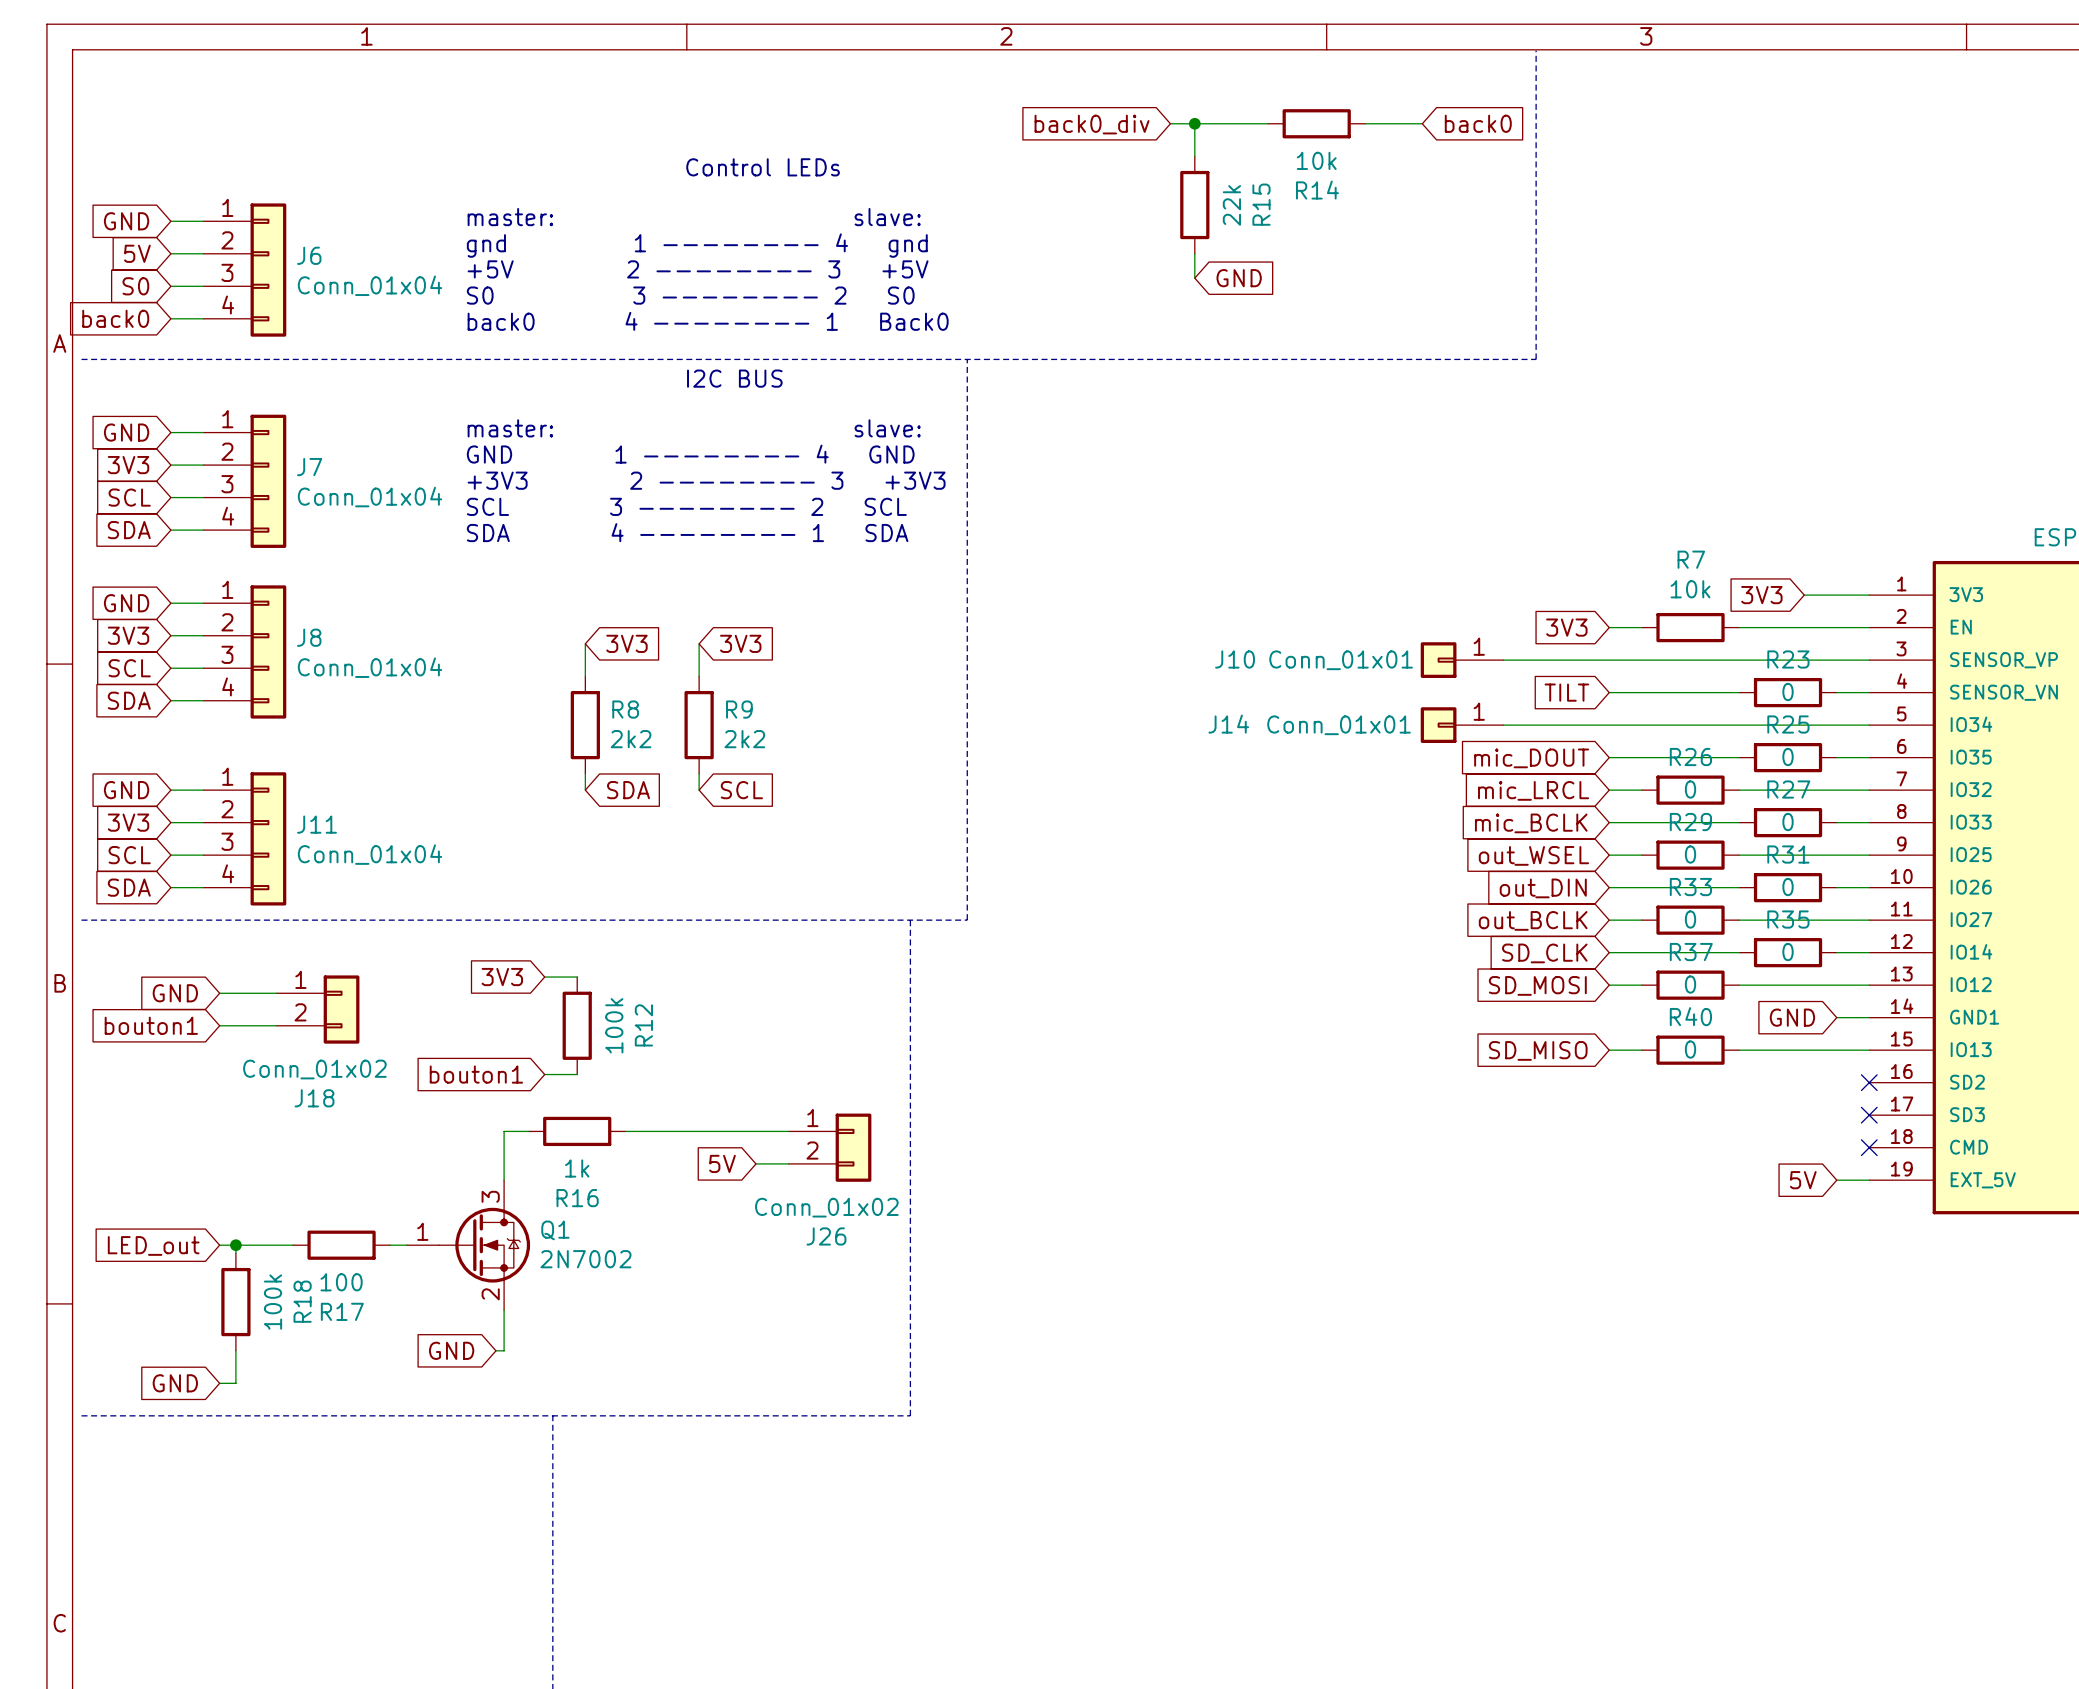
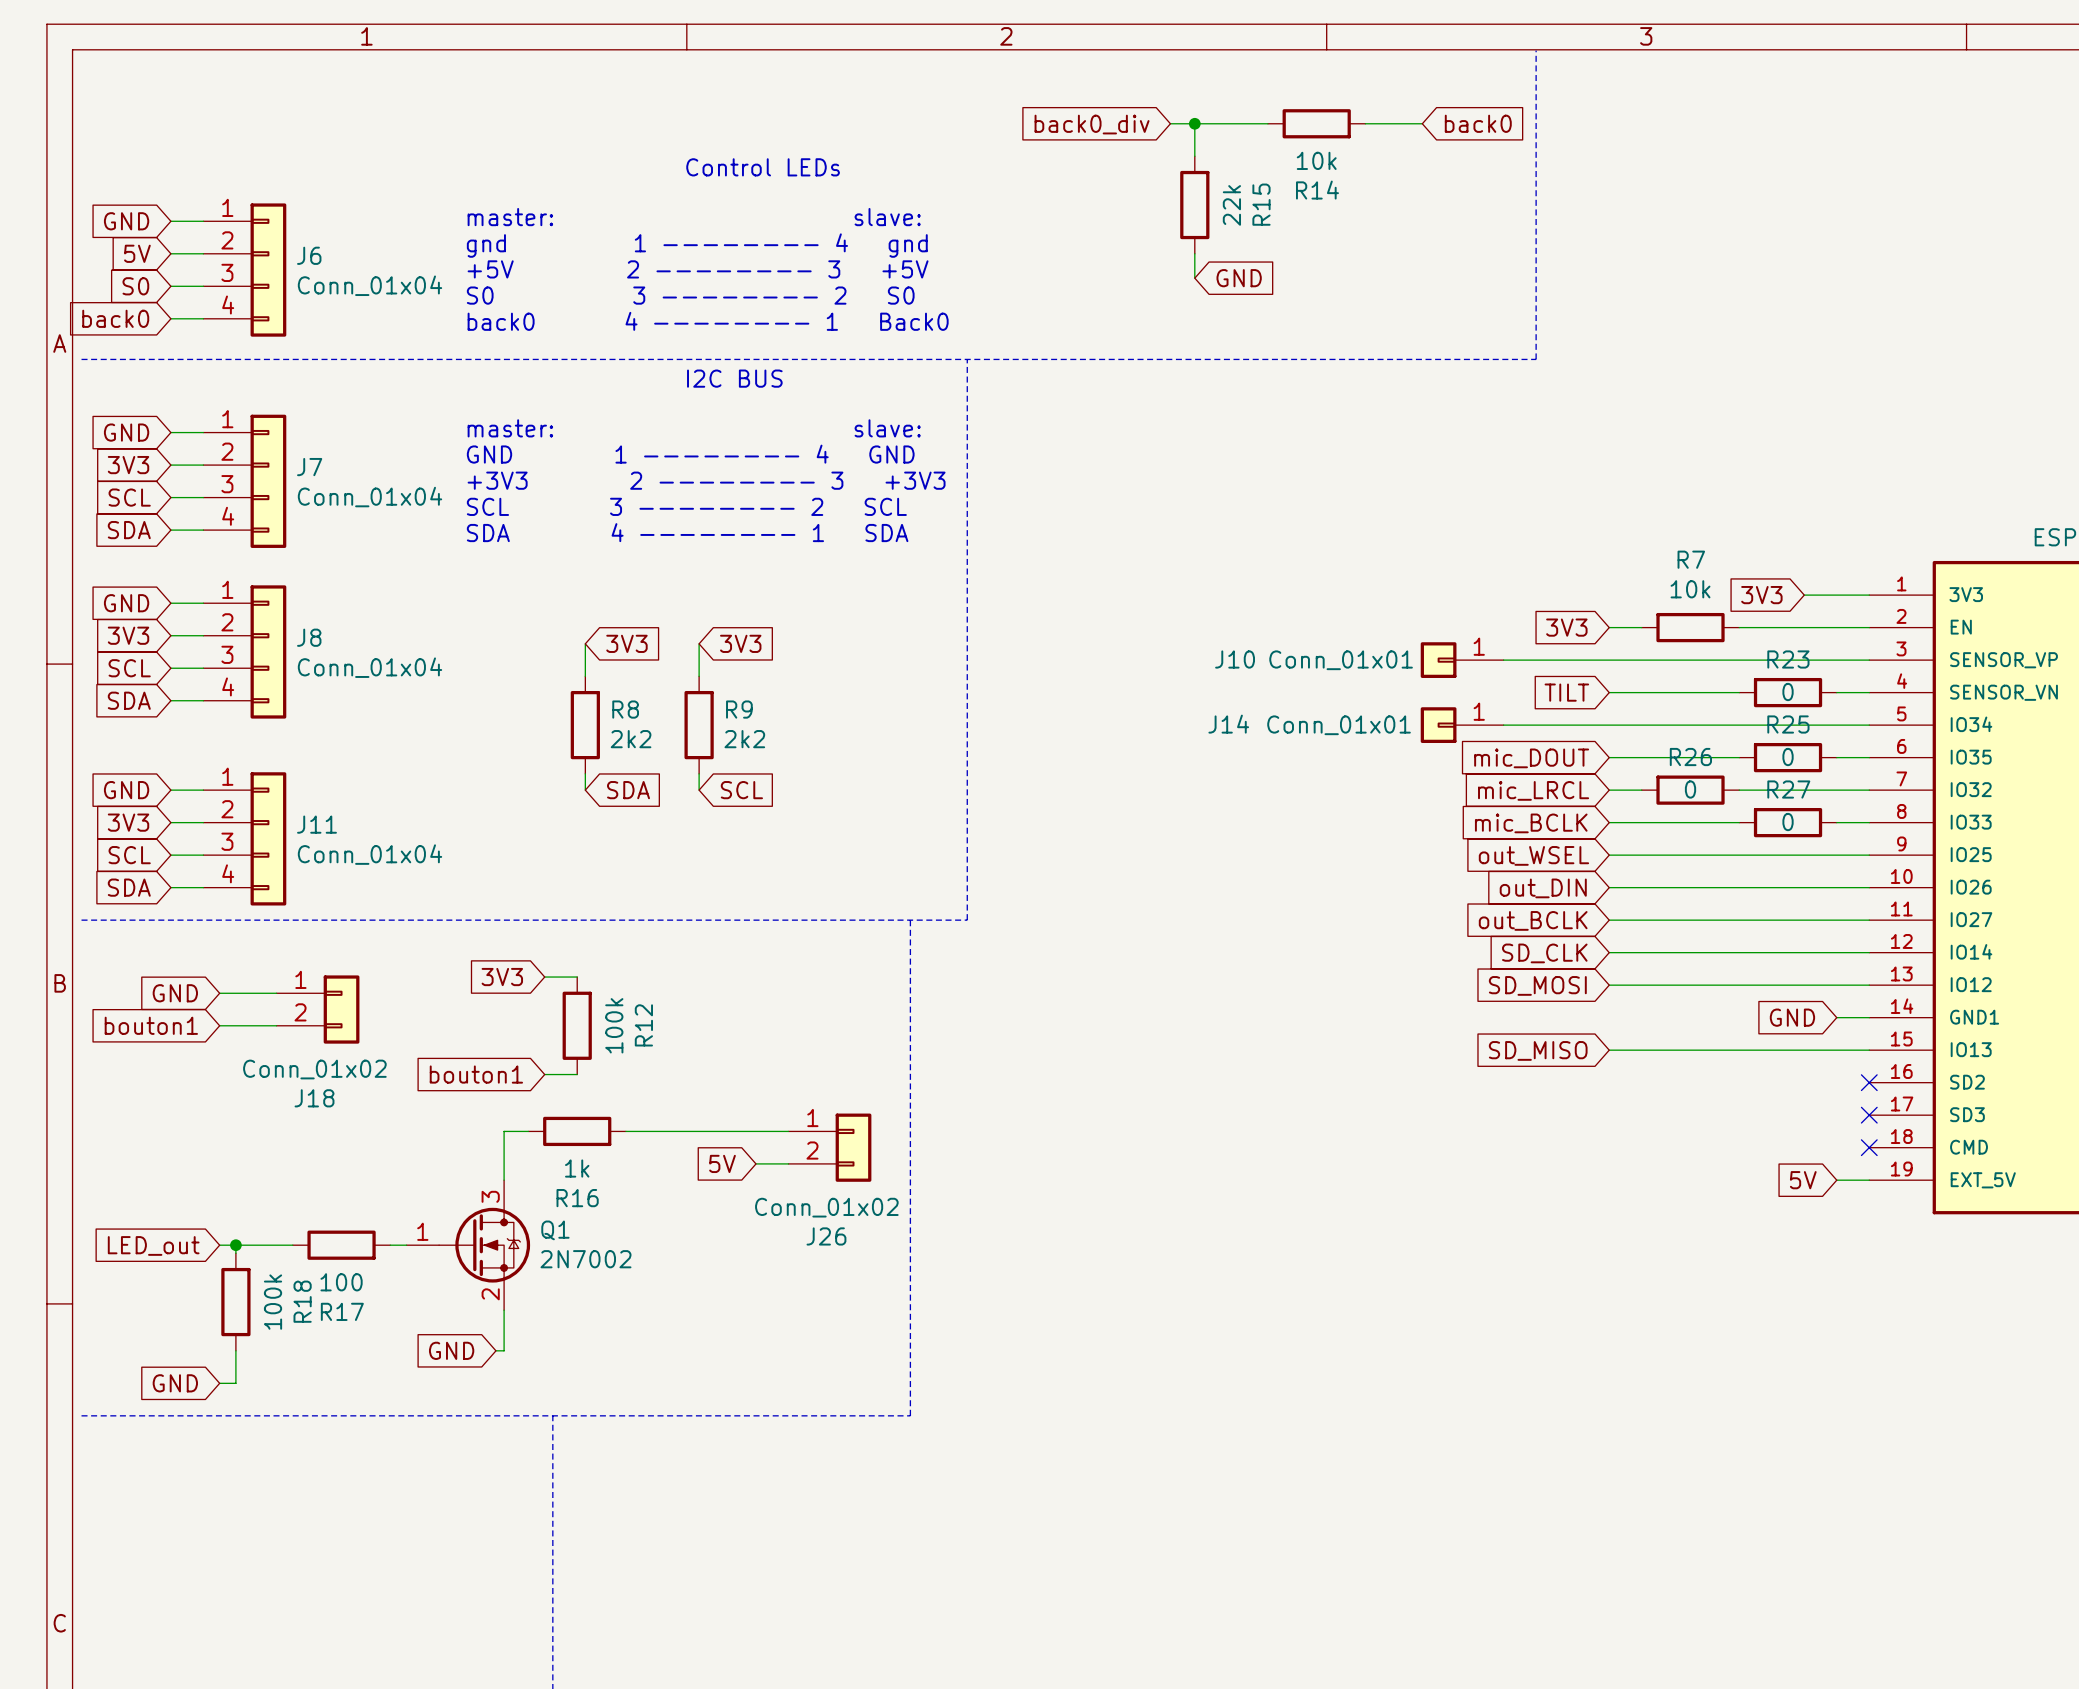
wire: none -> (1641, 855) (1739, 855)
R29: 0 (1690, 855) -> none
wire: none -> (1739, 887) (1836, 887)
R31: 0 (1788, 887) -> none
wire: none -> (1641, 920) (1739, 920)
R33: 0 (1690, 920) -> none
wire: none -> (1739, 952) (1836, 952)
R35: 0 (1788, 952) -> none
wire: none -> (1641, 985) (1739, 985)
R37: 0 (1690, 985) -> none
wire: none -> (1641, 1050) (1739, 1050)
R40: 0 (1690, 1050) -> none

